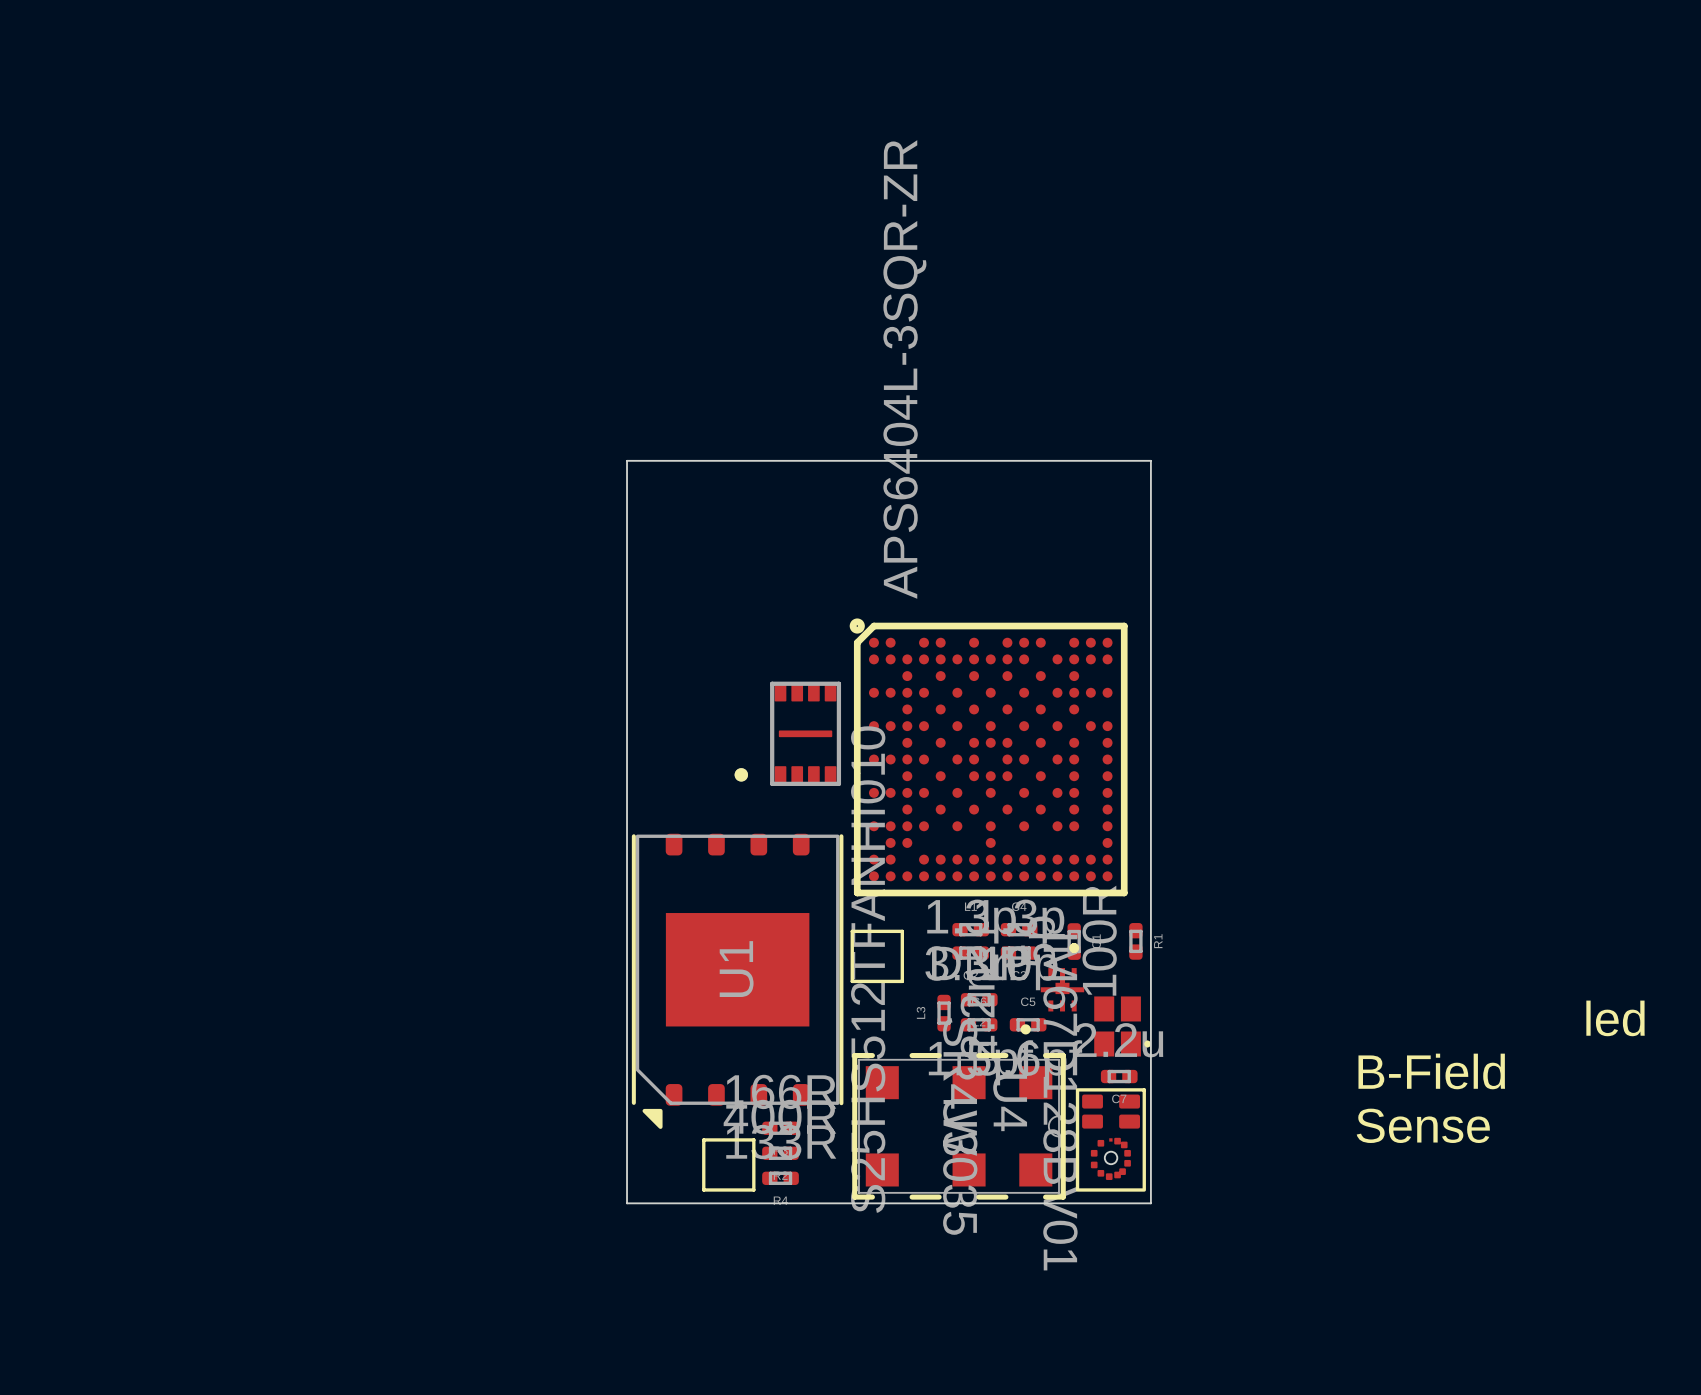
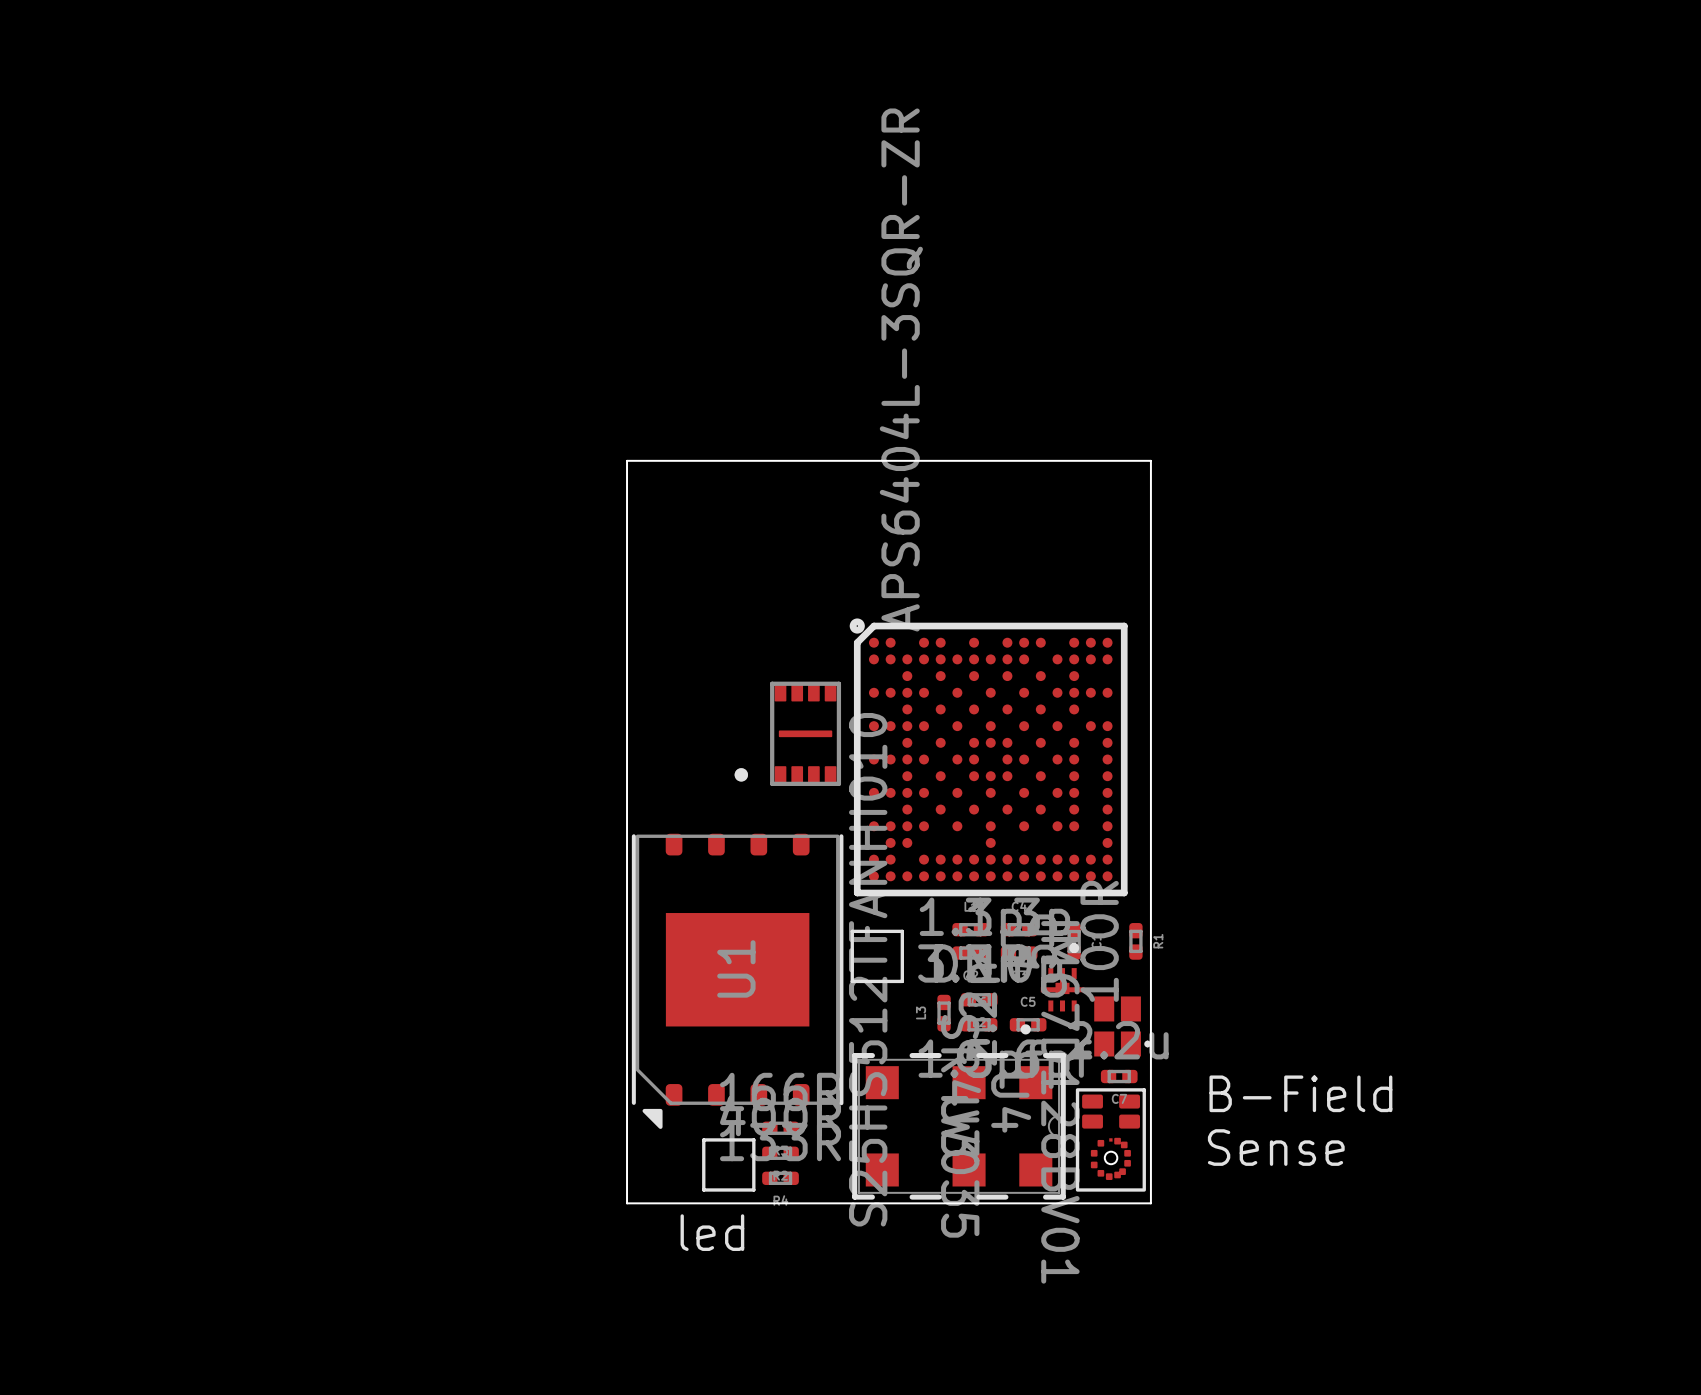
text: led (1615, 1018) -> none
text position: B-Field (1431, 1071) -> B-Field (1300, 1093)
text position: Sense (1423, 1125) -> Sense (1276, 1147)
text: none -> led (712, 1232)

